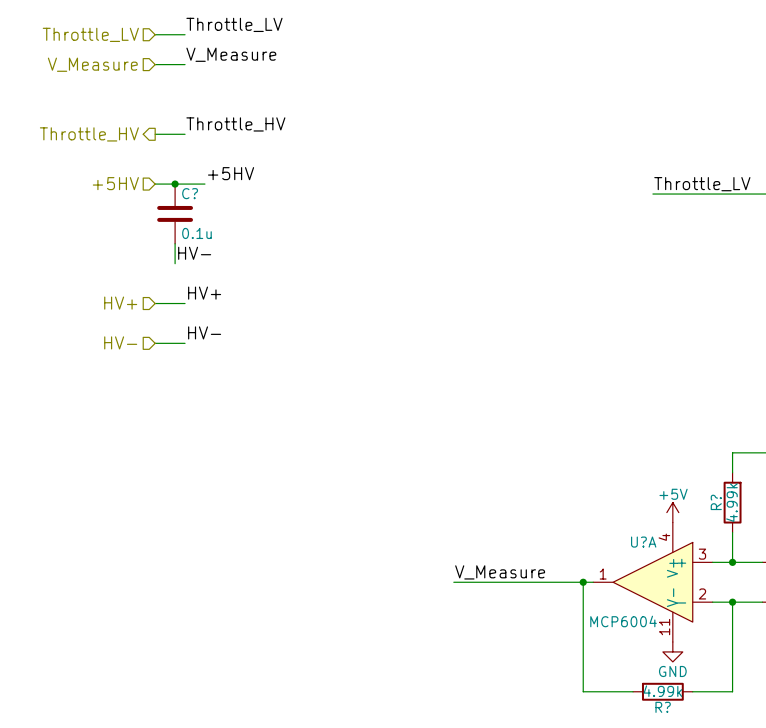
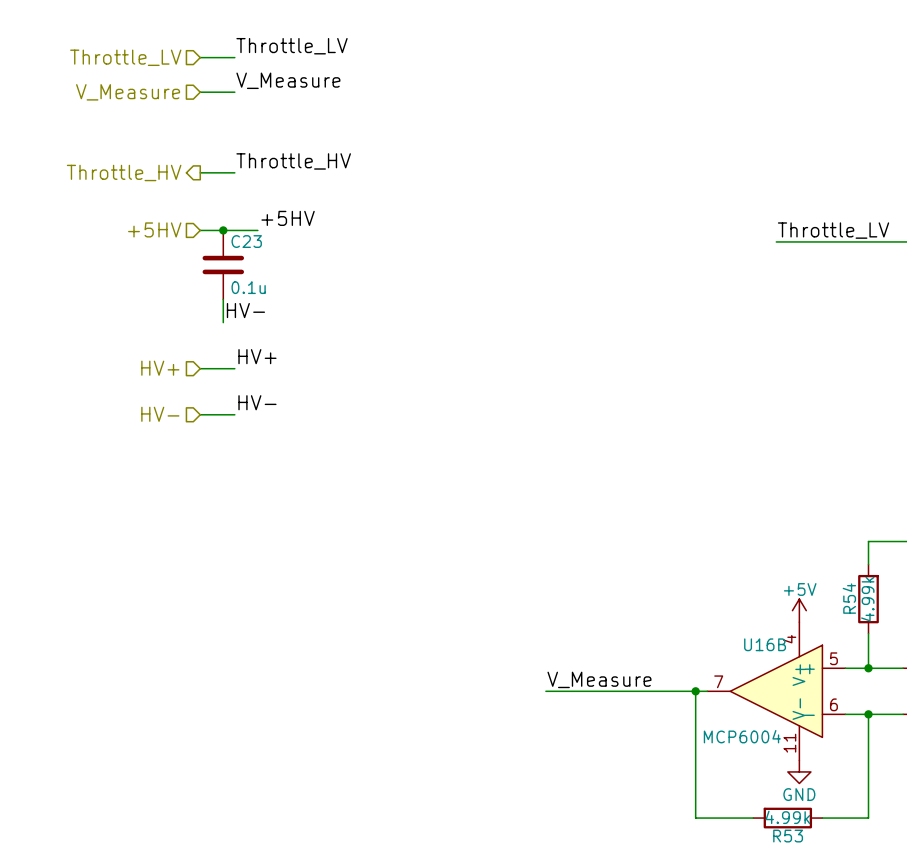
C? name: C? (190, 193) -> C23 (246, 241)
R? name: R? (716, 502) -> R54 (849, 598)
U?A name: U?A (643, 542) -> U16B (765, 644)
U?A pin number: 3 (702, 554) -> 5 (833, 658)
U?A pin number: 1 (603, 574) -> 7 (718, 681)
U?A pin number: 2 (702, 593) -> 6 (833, 704)
R? name: R? (663, 707) -> R53 (788, 836)

